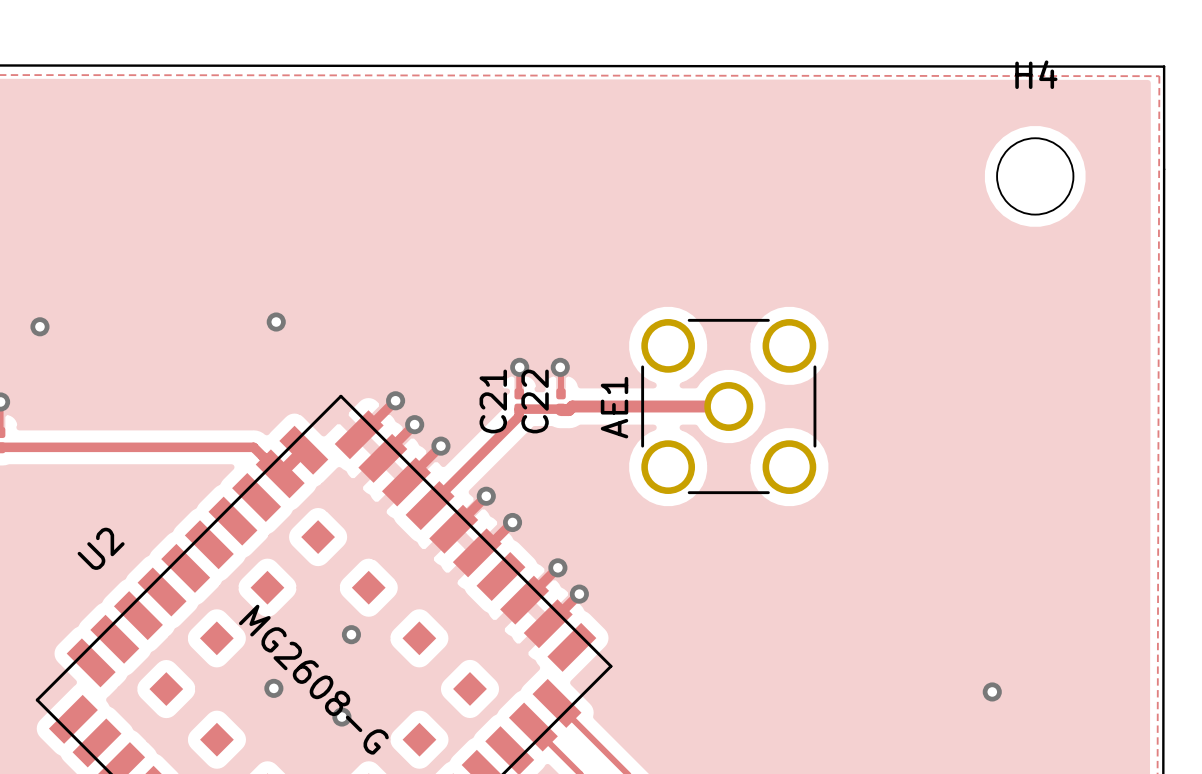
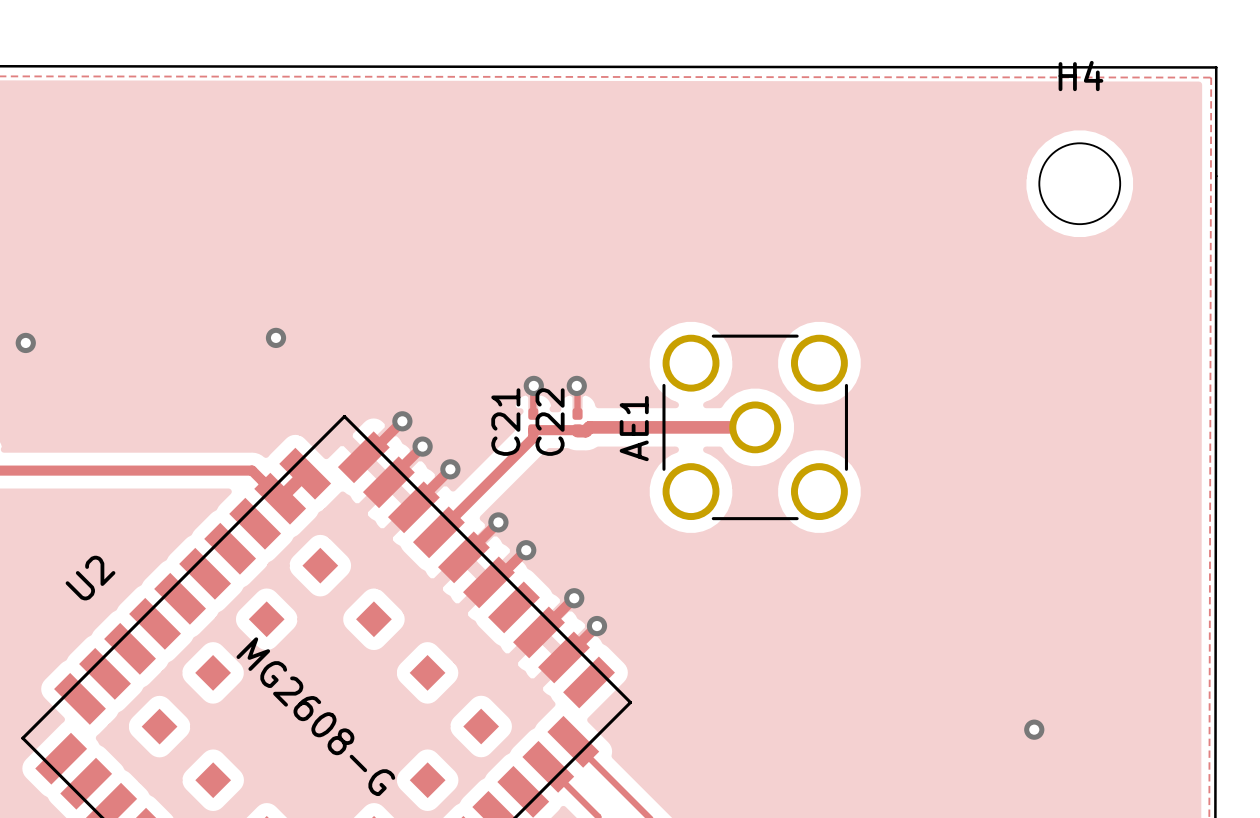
via: (351, 634) -> none
via: (273, 688) -> none
via: (341, 717) -> none

